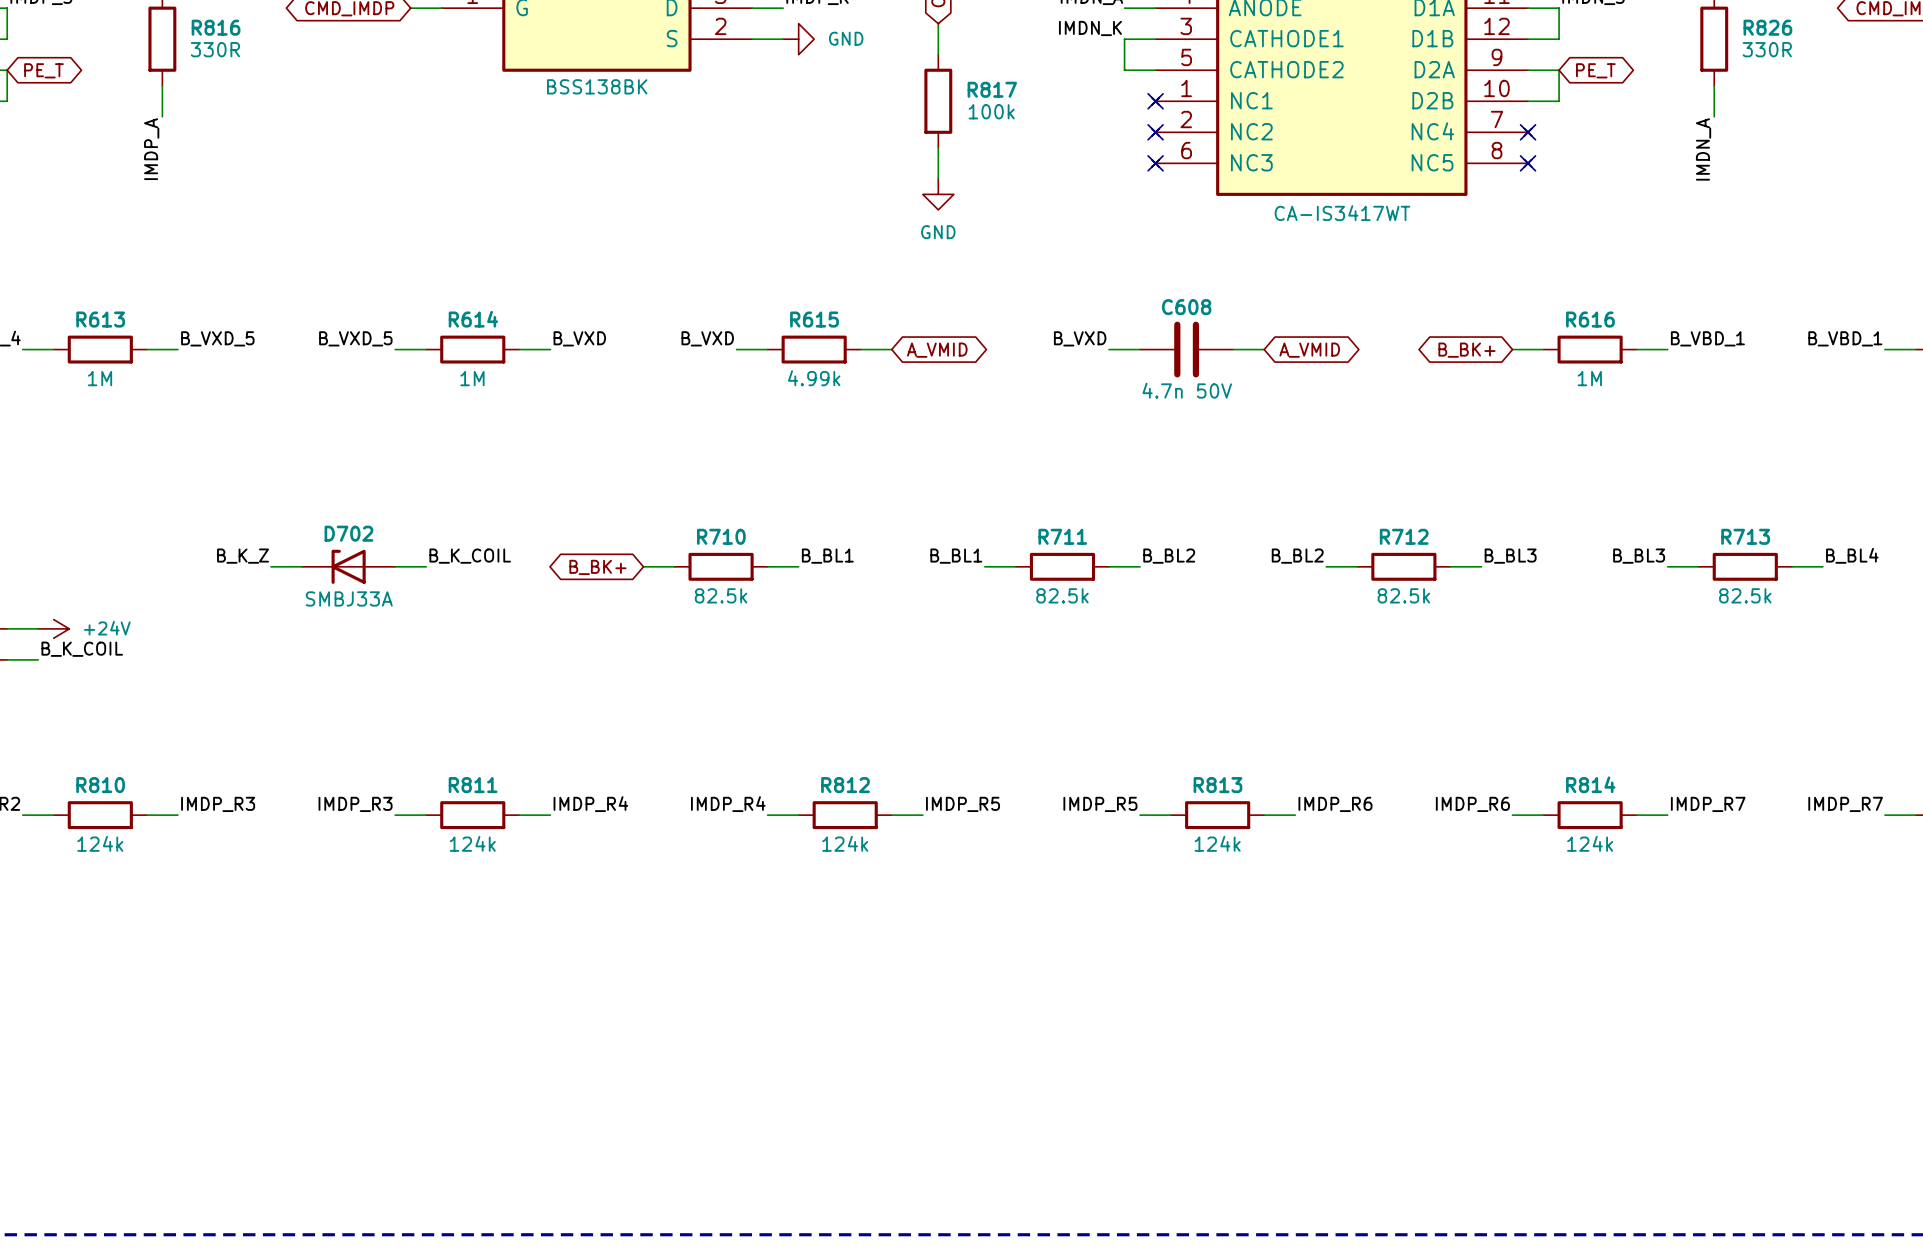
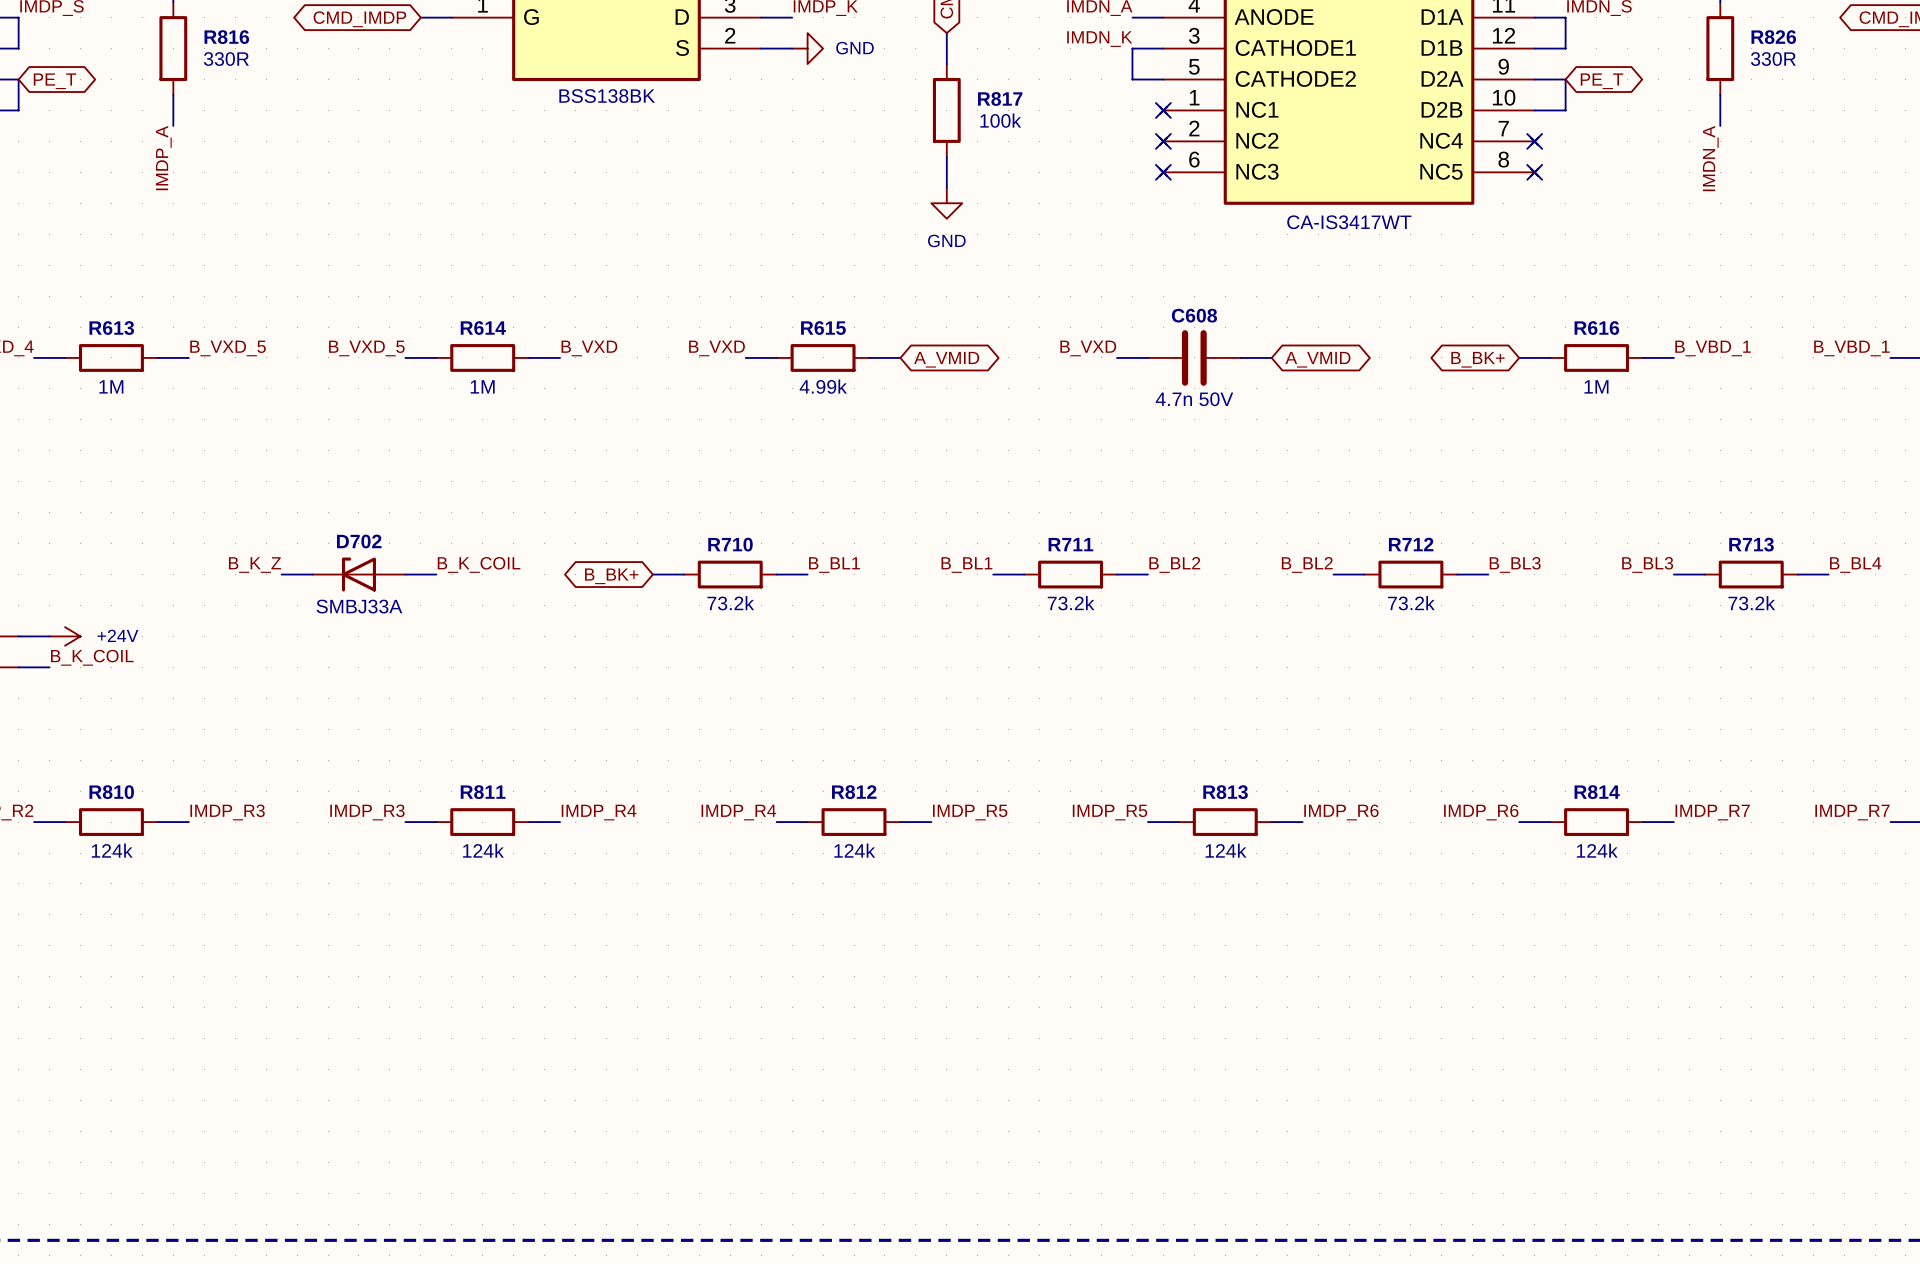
R710 value: 82.5k (721, 595) -> 73.2k (730, 603)
R711 value: 82.5k (1062, 595) -> 73.2k (1071, 603)
R712 value: 82.5k (1403, 595) -> 73.2k (1411, 603)
R713 value: 82.5k (1745, 595) -> 73.2k (1751, 603)

